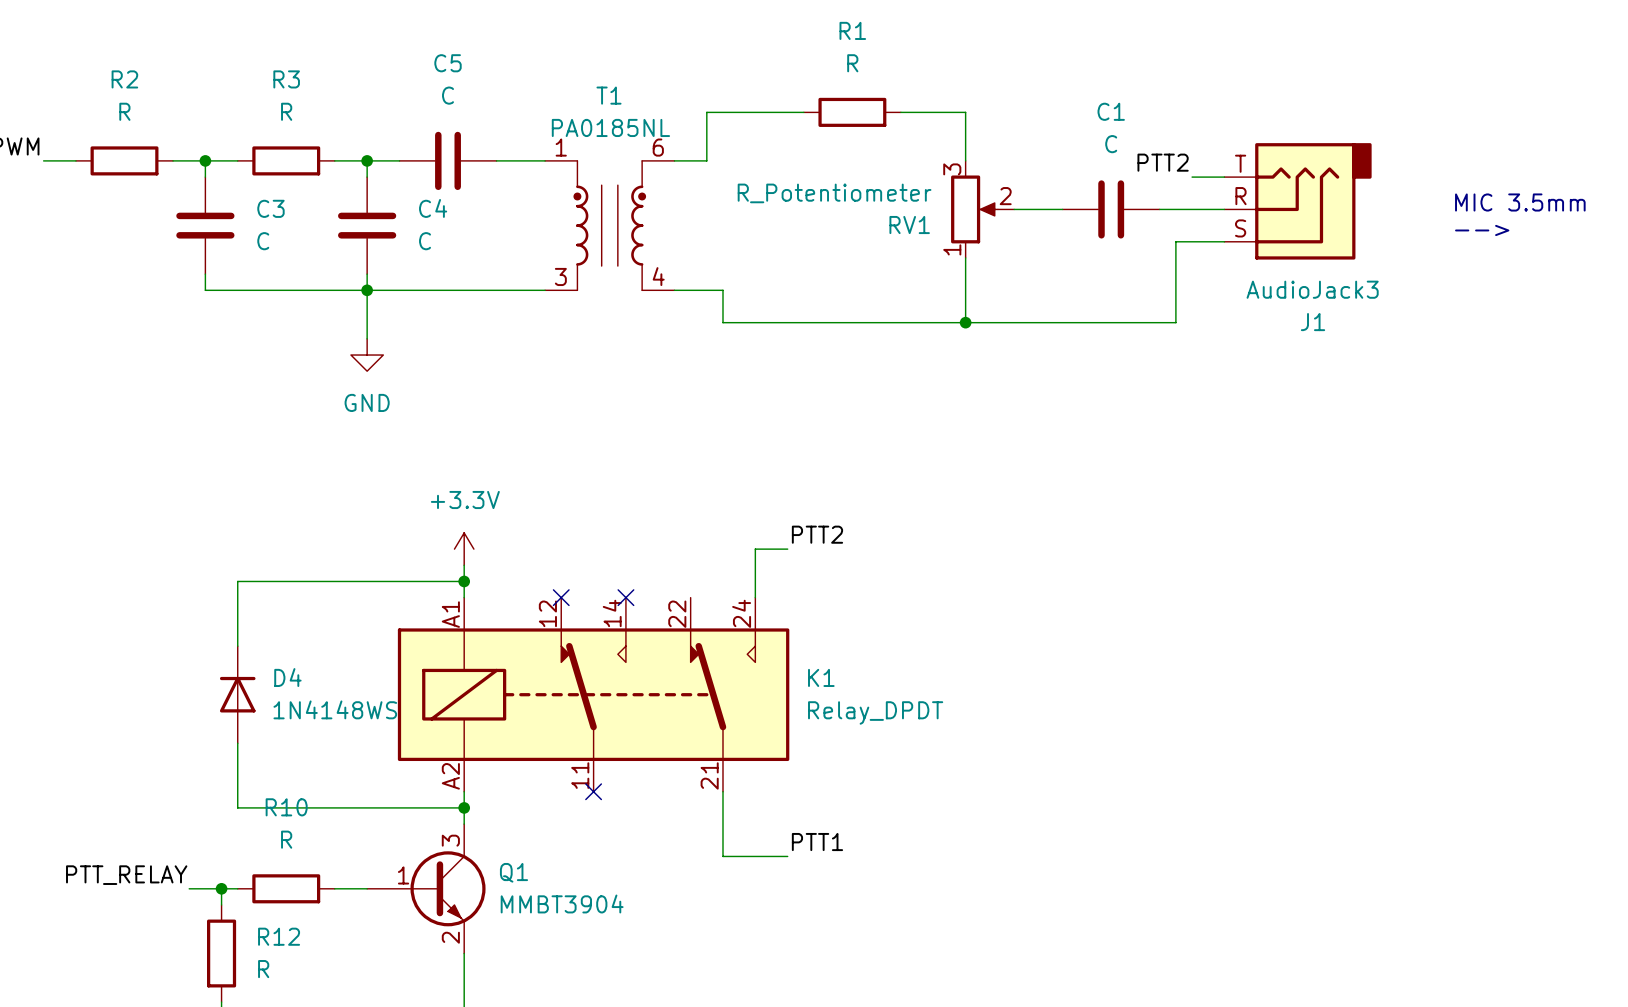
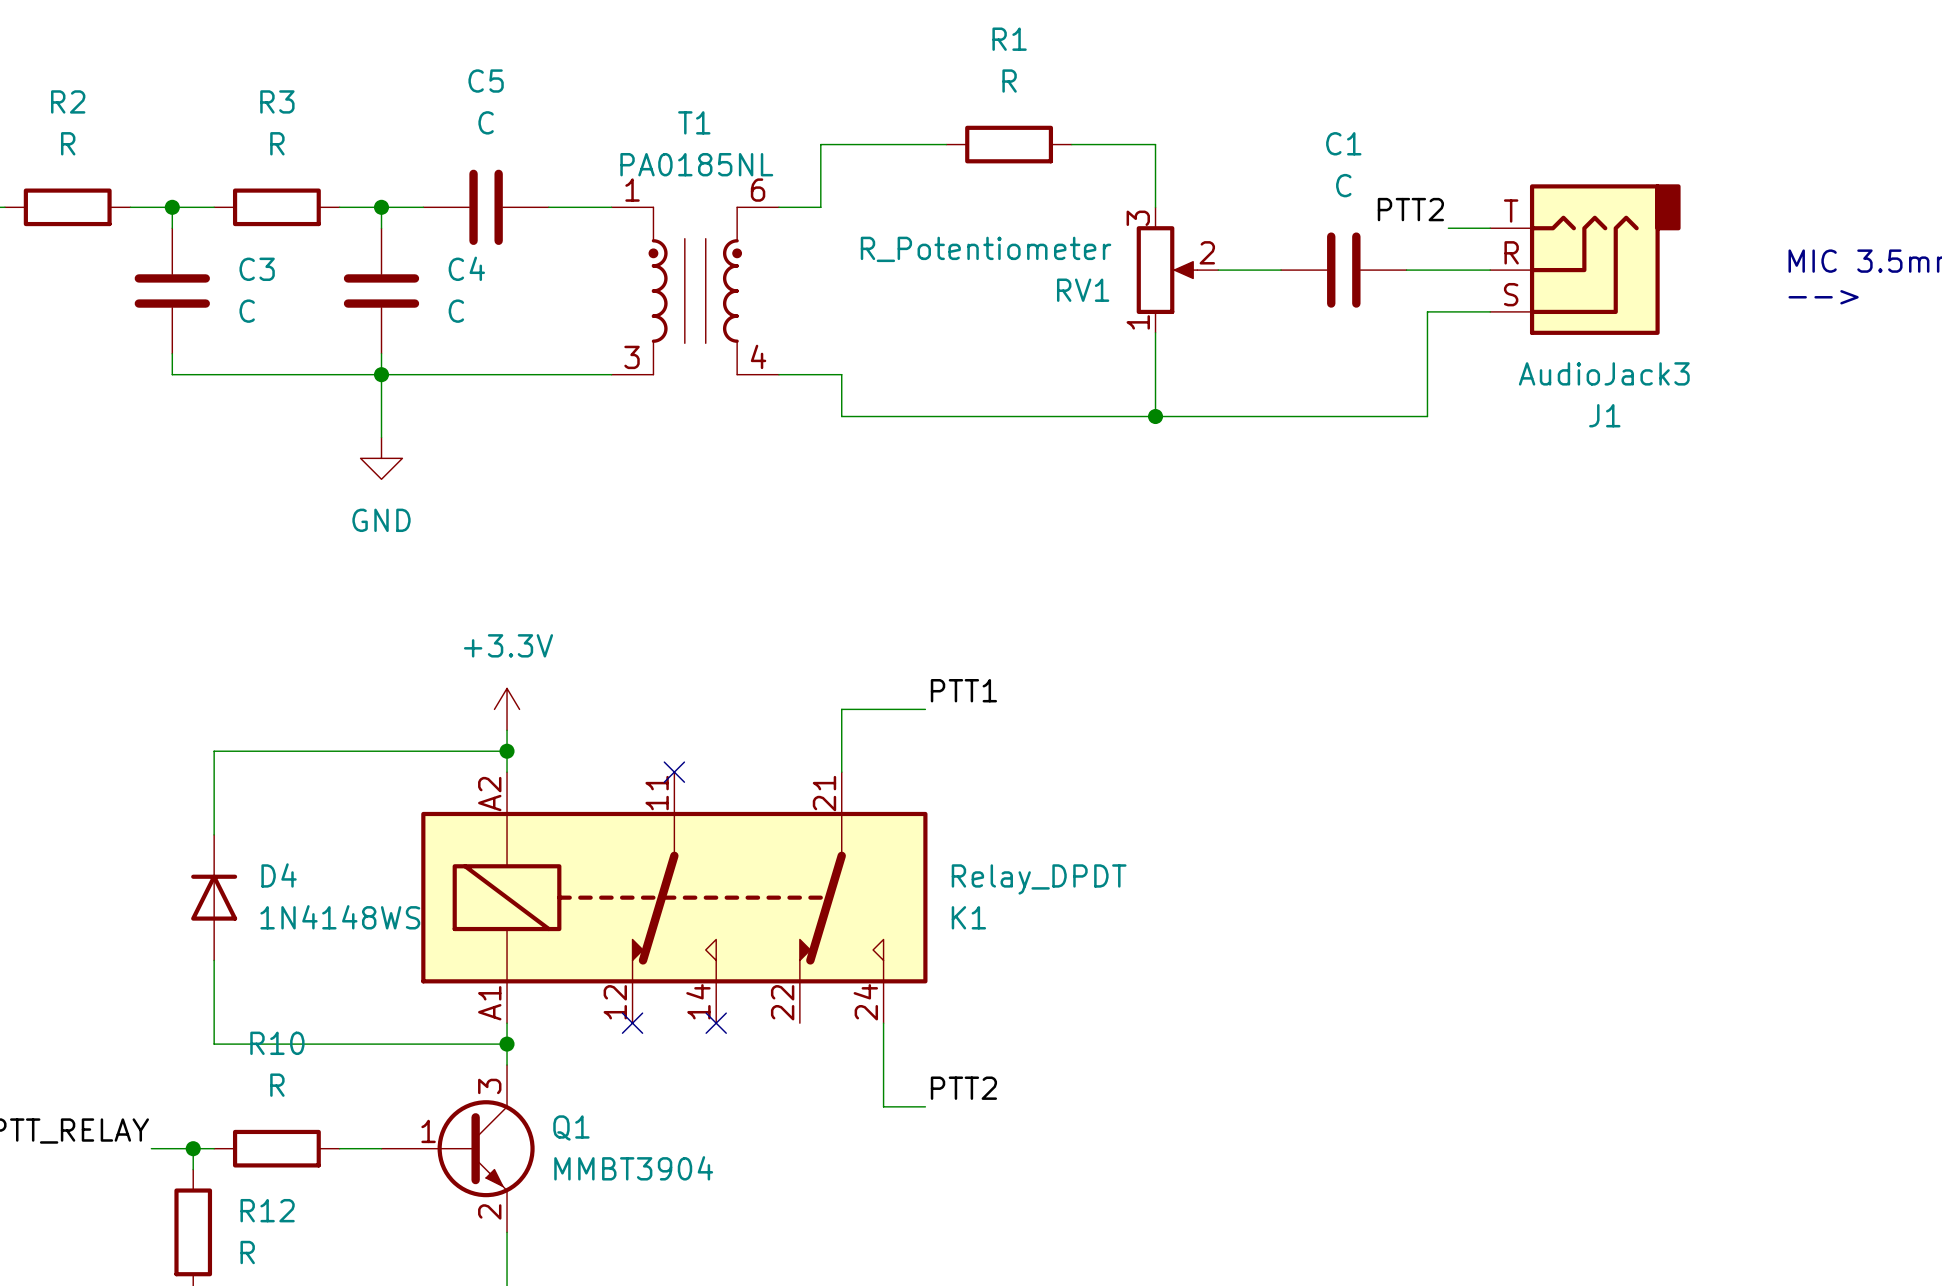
label: PTT2 (817, 534) -> PTT1 (963, 690)
wire: (755, 549) (755, 597) -> (883, 709) (841, 709) (841, 772)
no-connect mark: (561, 597) -> none
no-connect mark: none -> (674, 772)
no-connect mark: (625, 597) -> none
K1 flip: as is (593, 694) -> up-down (674, 897)
no-connect mark: none -> (632, 1023)
no-connect mark: (593, 791) -> none
no-connect mark: none -> (716, 1023)
wire: (722, 791) (722, 856) (755, 856) -> (883, 1023) (883, 1106)
label: PTT1 (817, 842) -> PTT2 (963, 1088)

